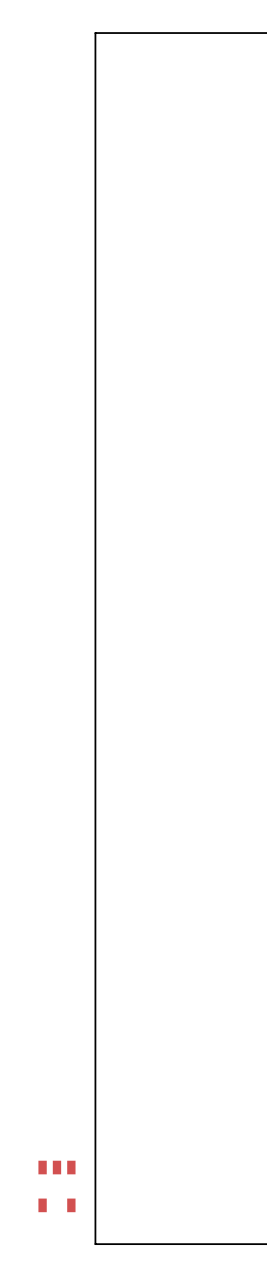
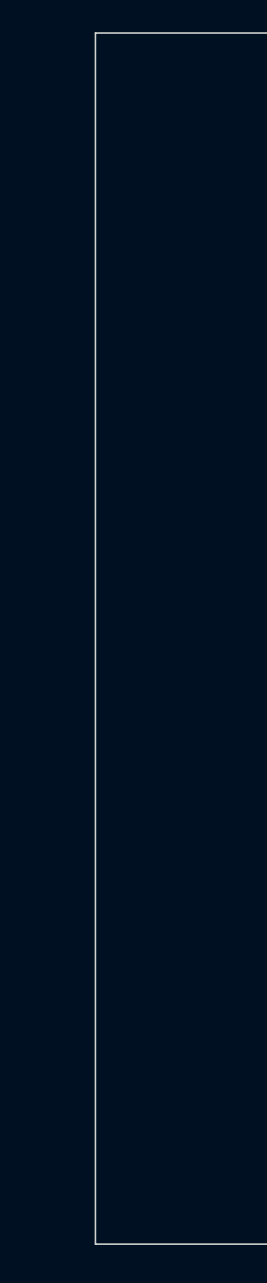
part: (56, 1186) -> none

